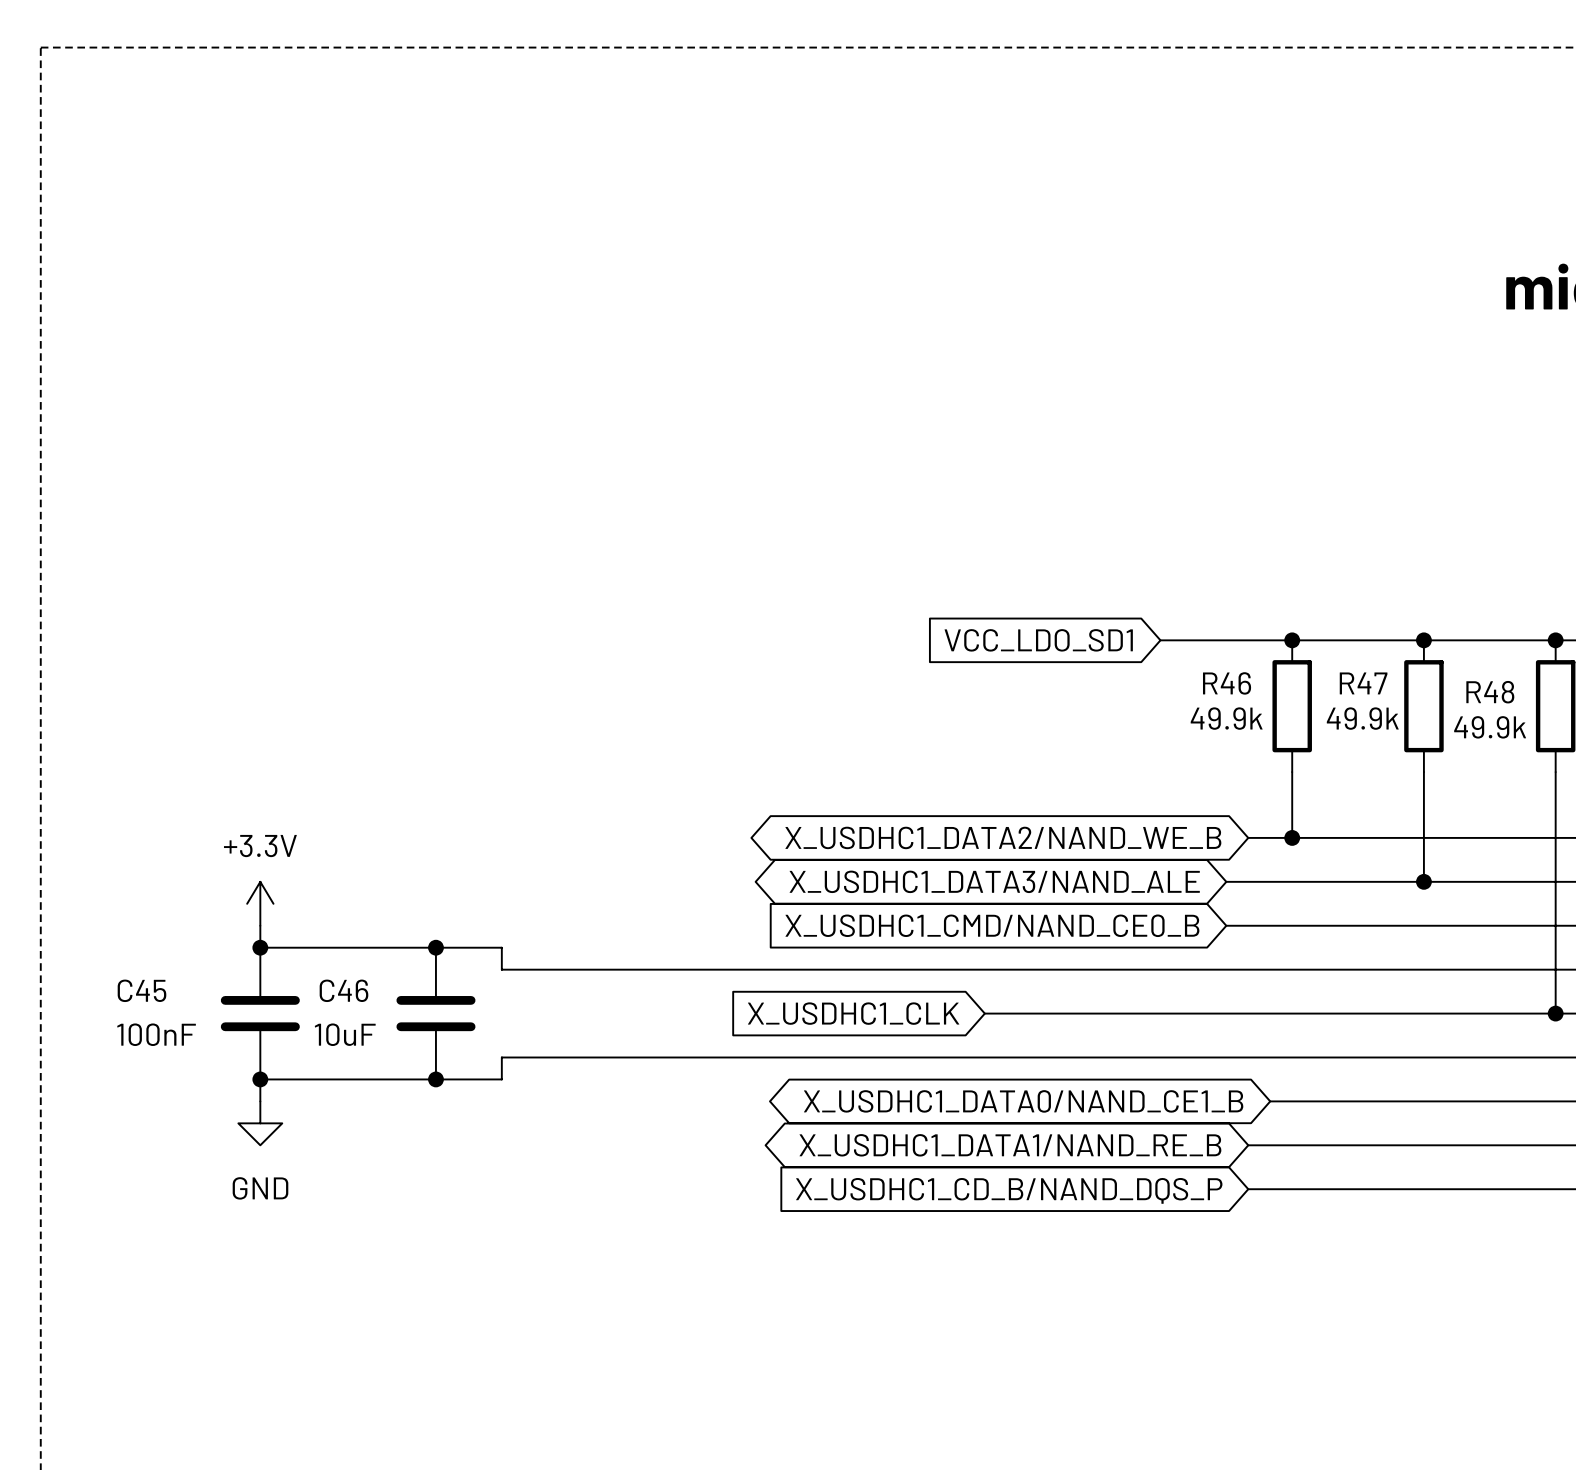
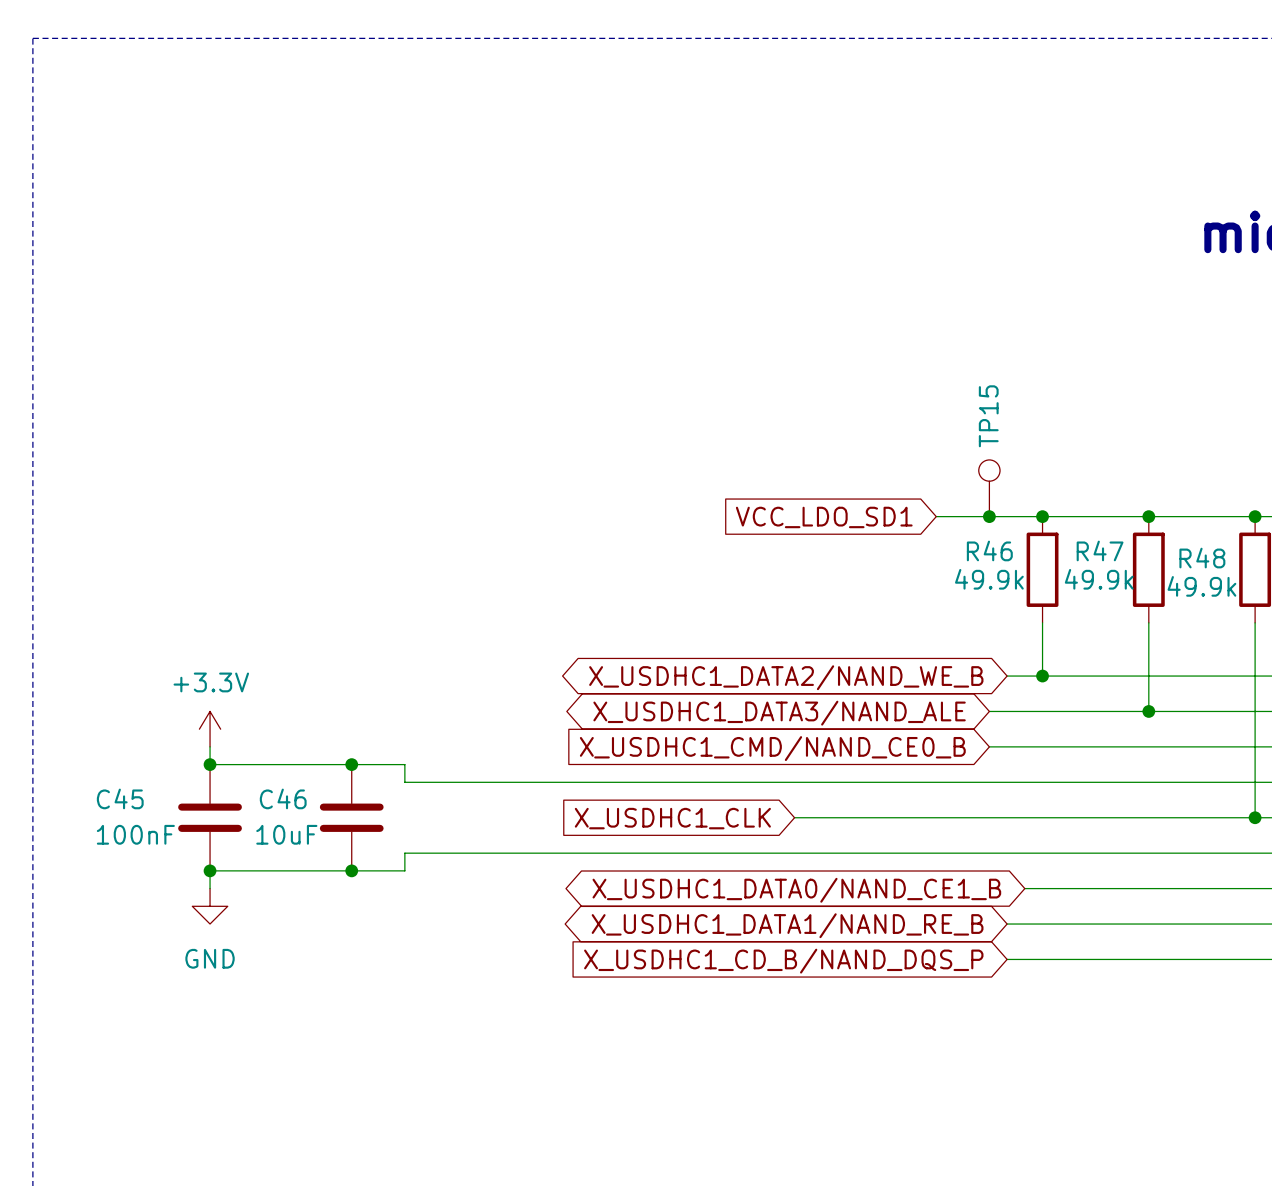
TP15: none -> (989, 488)
junction: none -> (989, 516)

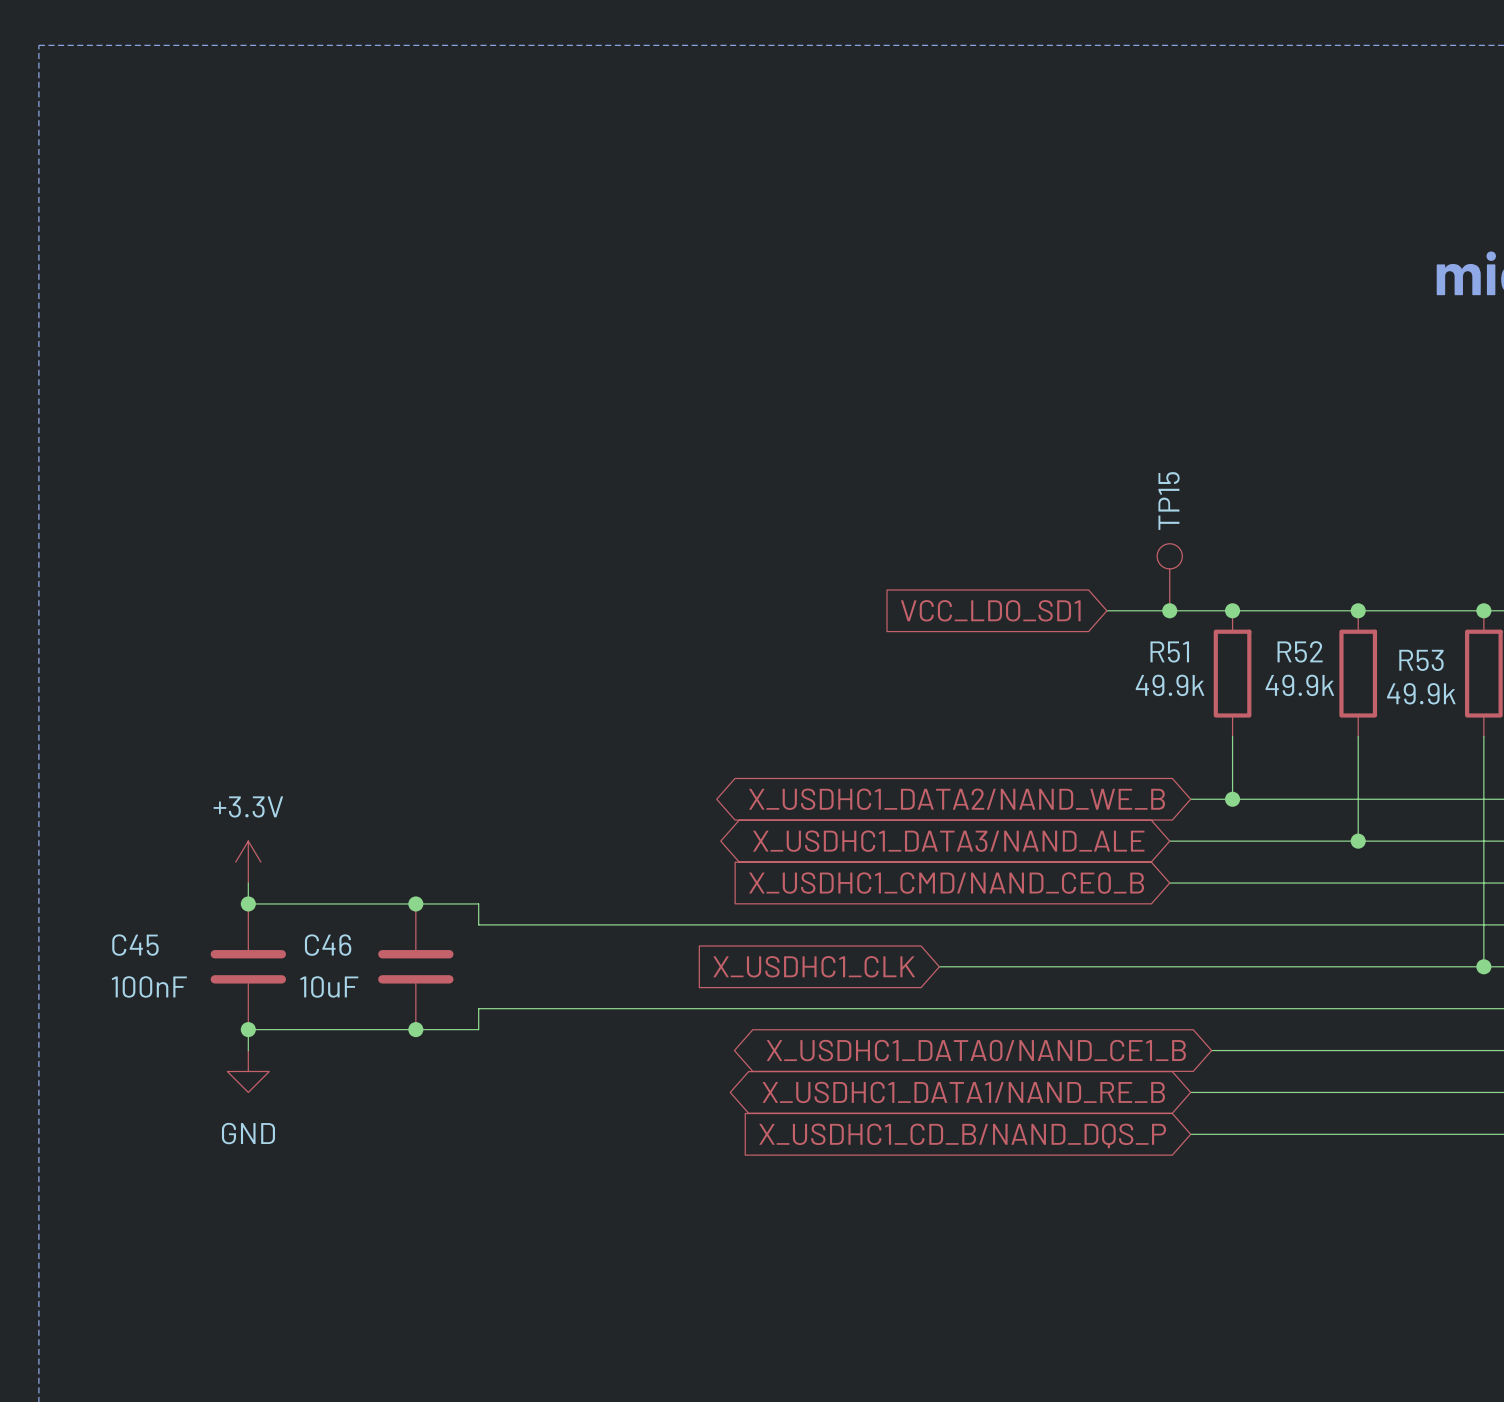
R46 name: R46 (989, 550) -> R51 (1169, 651)
R47 name: R47 (1100, 550) -> R52 (1300, 651)
R48 name: R48 (1202, 558) -> R53 (1421, 660)

